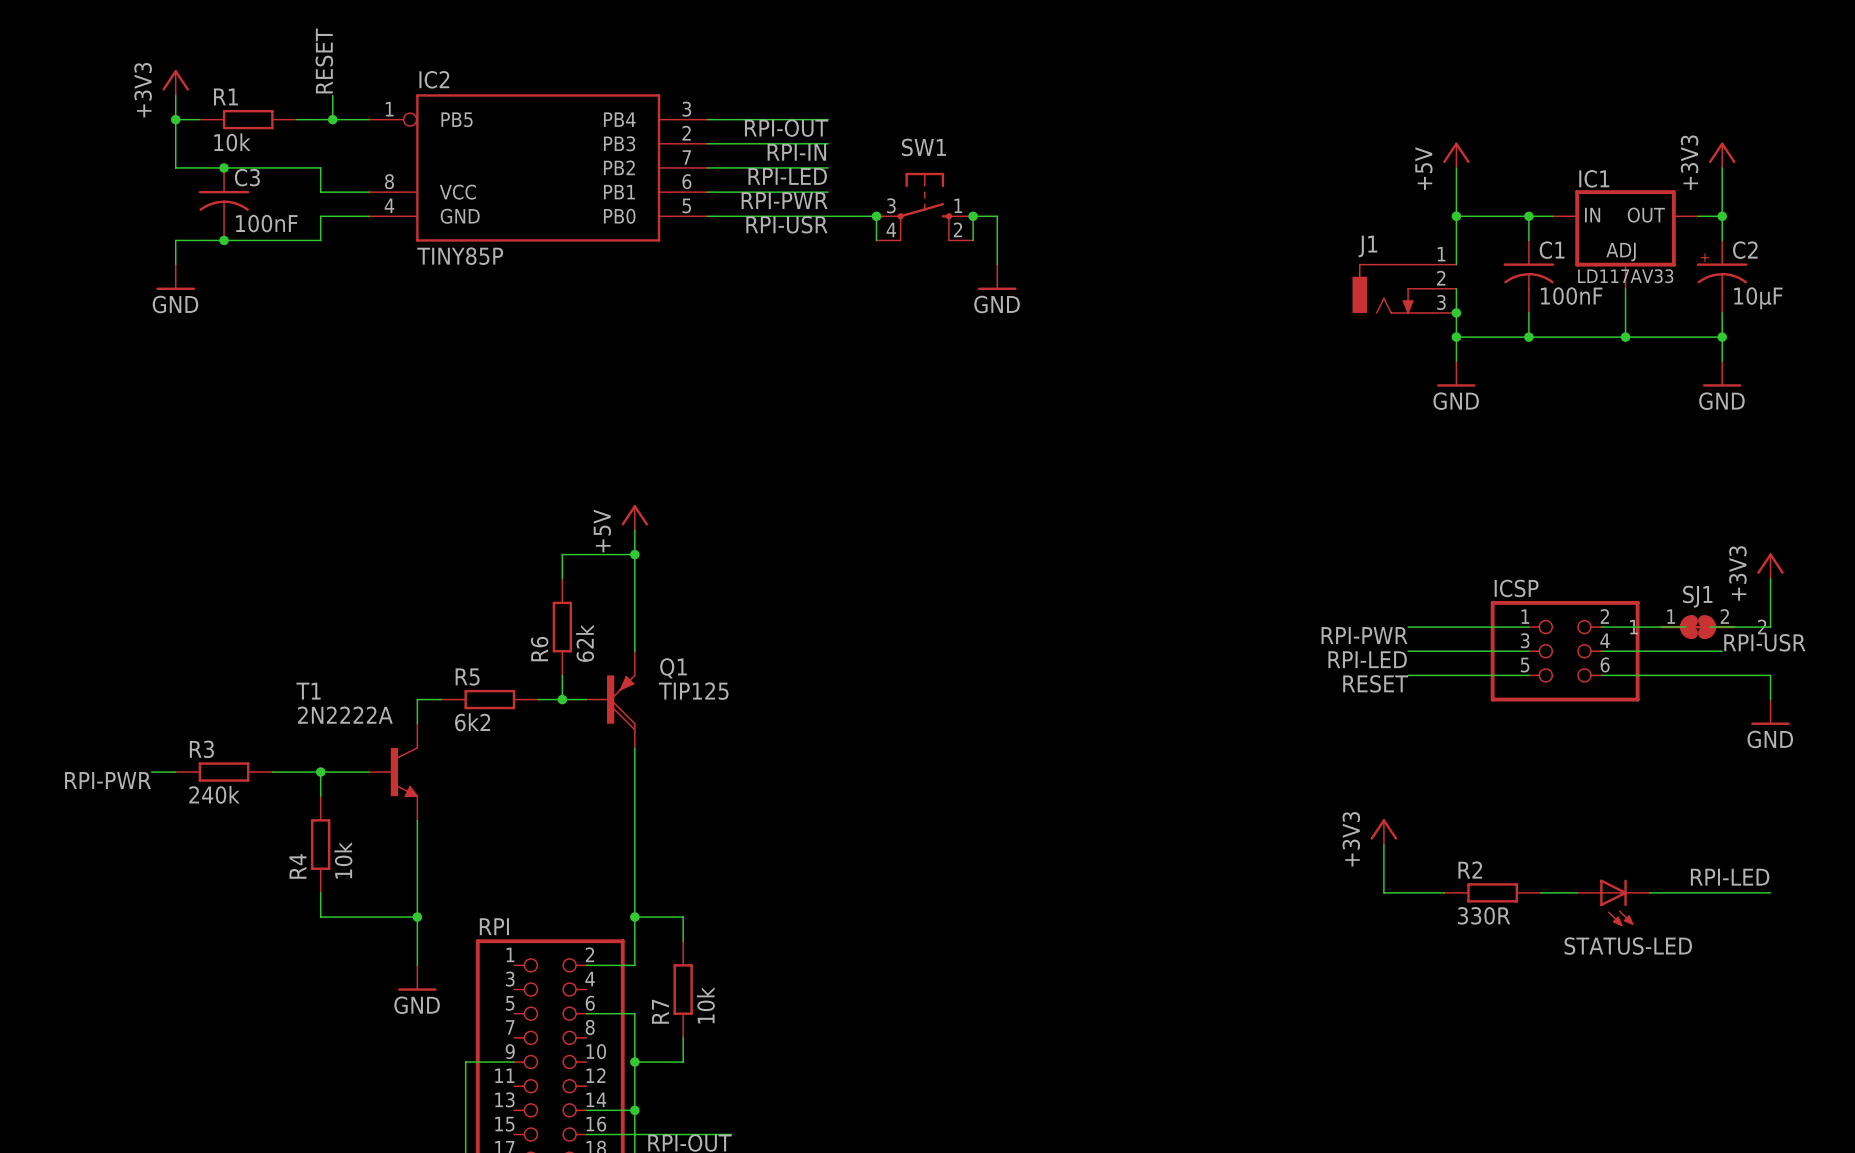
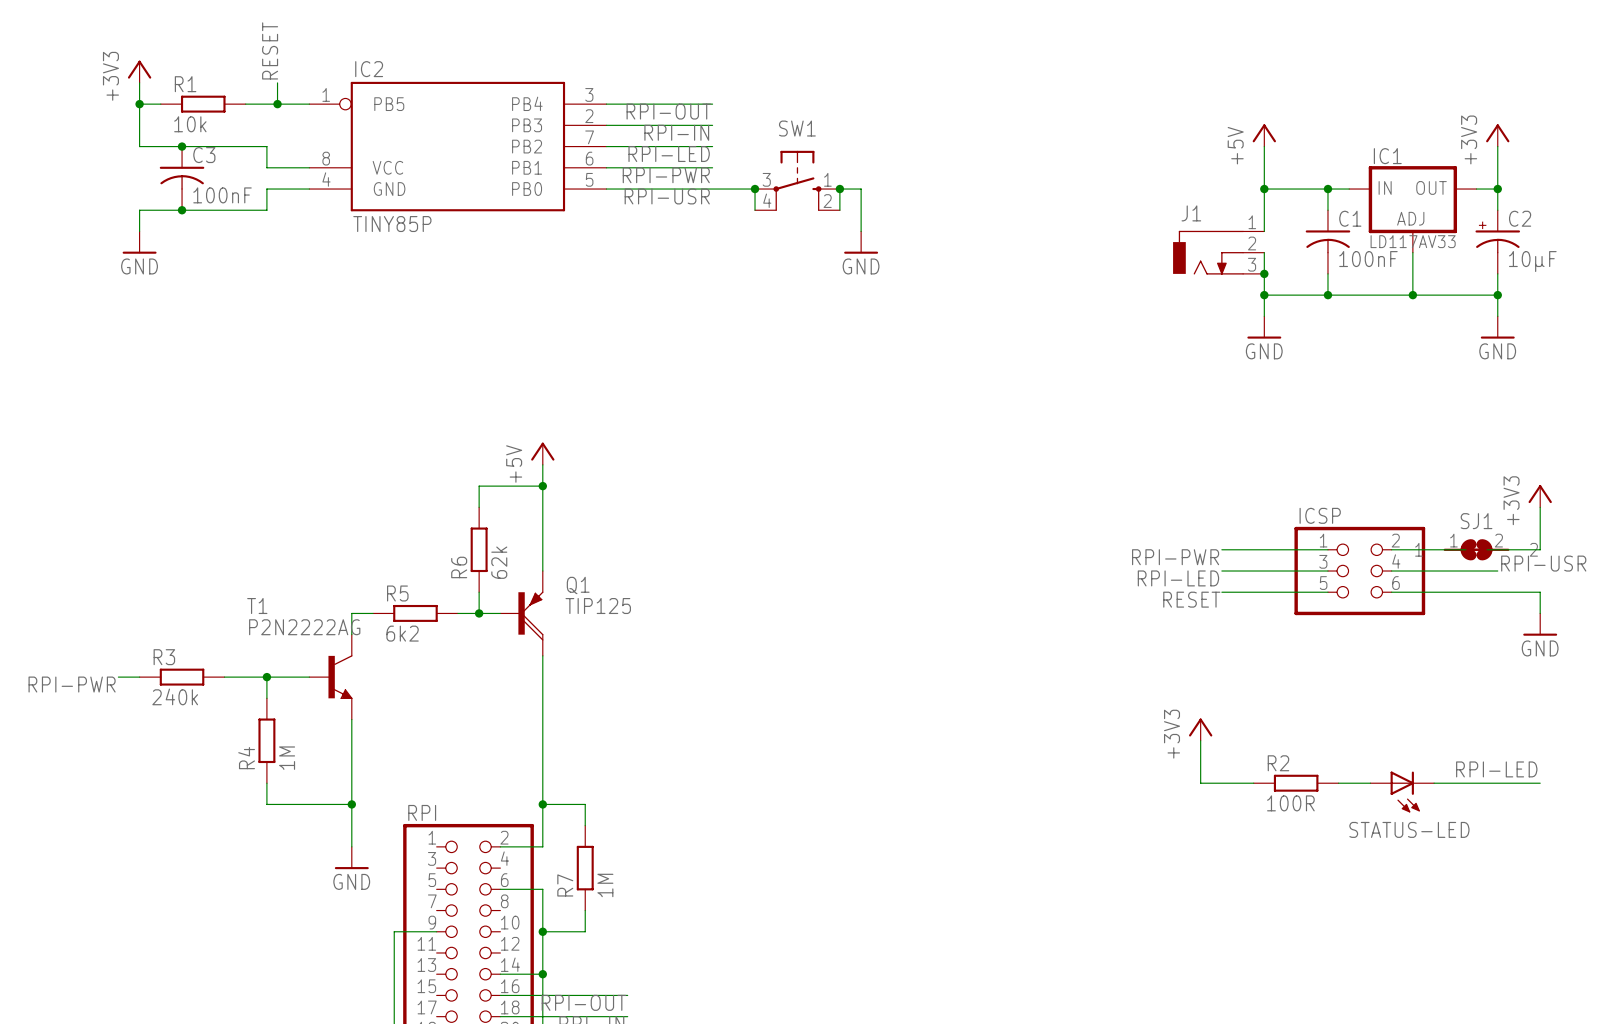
T1 value: 2N2222A (345, 715) -> P2N2222AG (304, 627)
R4 value: 10k (343, 860) -> 1M (287, 758)
R2 value: 330R (1484, 915) -> 100R (1290, 803)
R7 value: 10k (705, 1005) -> 1M (605, 885)

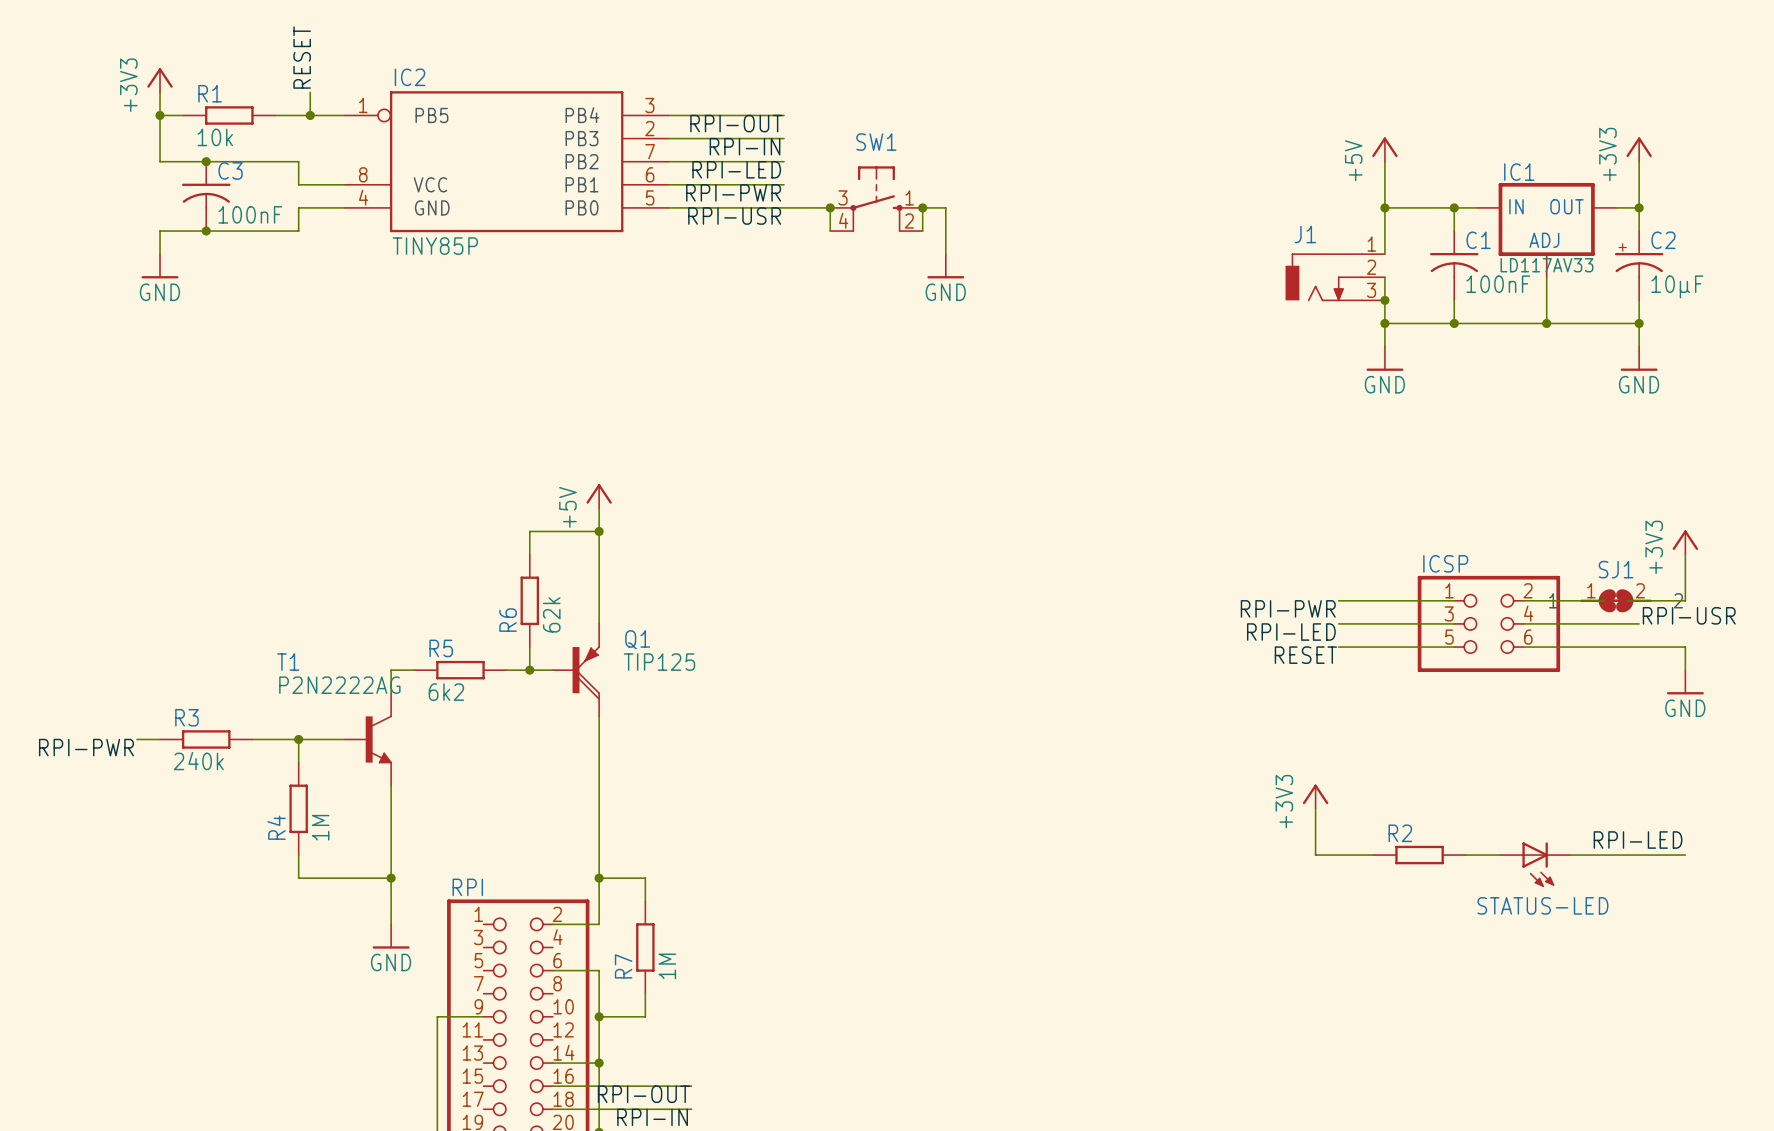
R2 value: 100R (1290, 803) -> none

